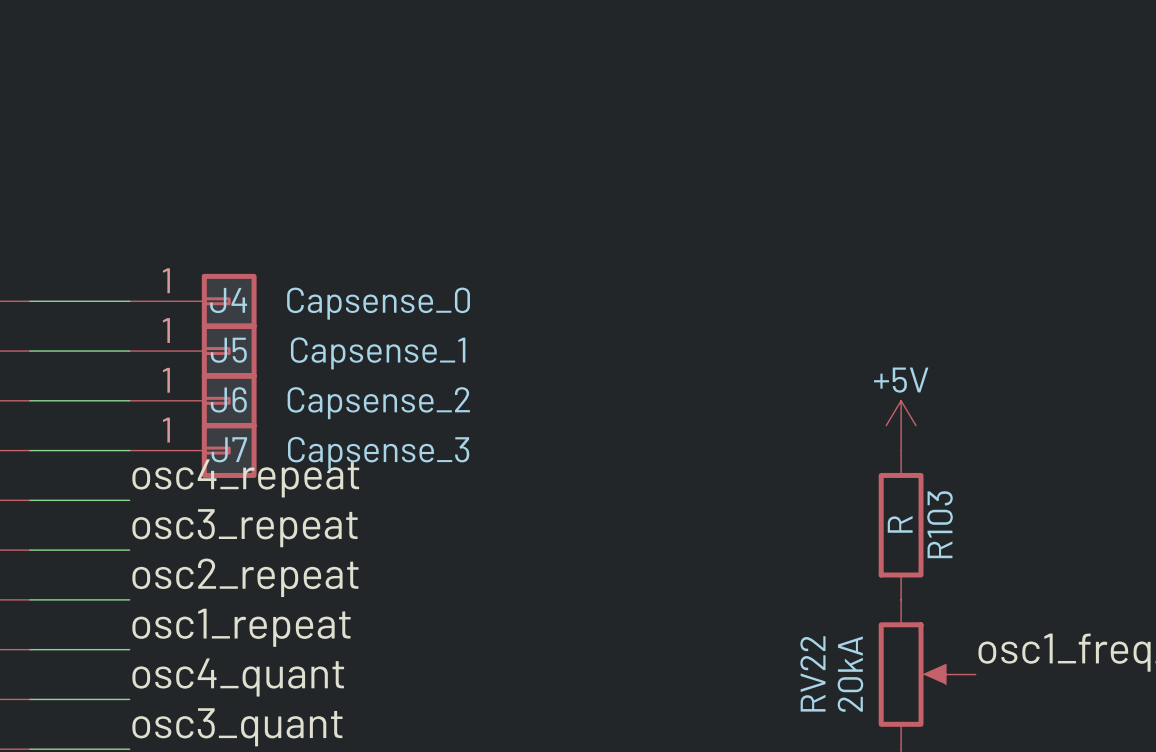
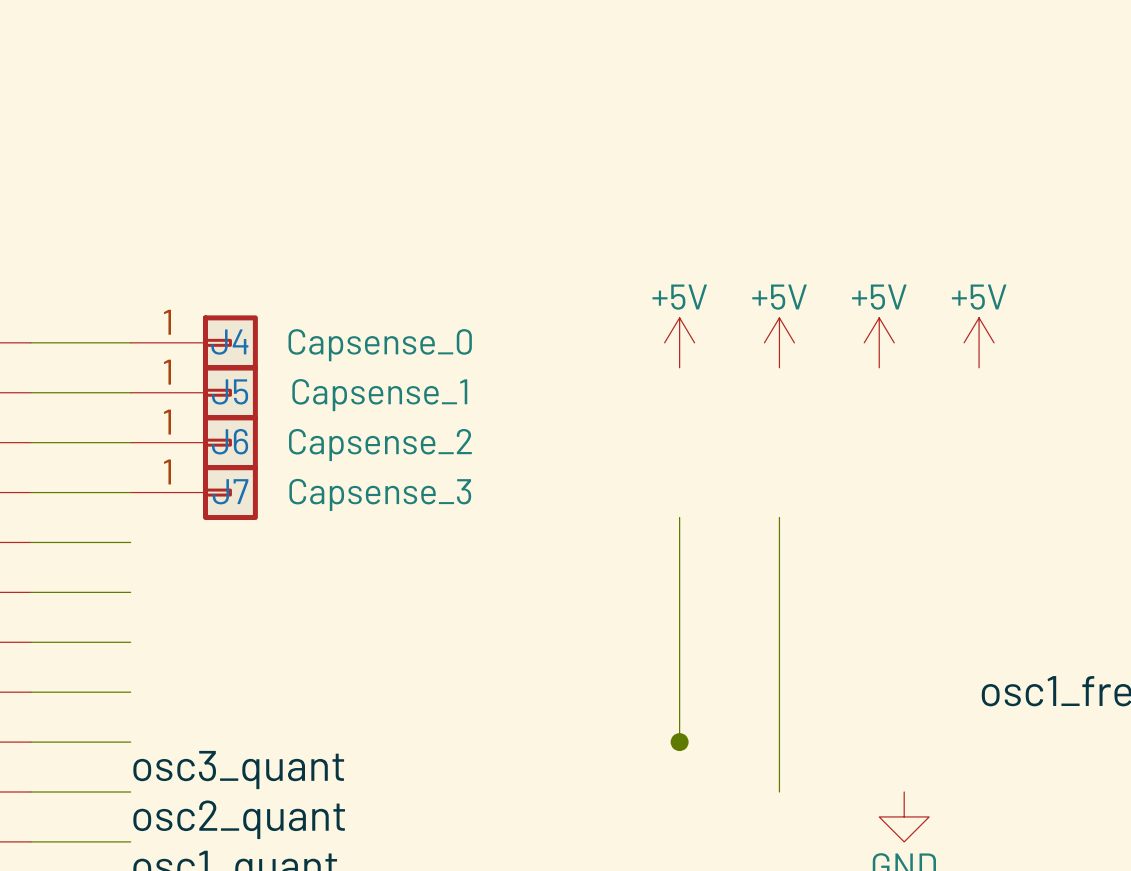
power symbol: none -> +5V (679, 342)
power symbol: none -> +5V (779, 342)
power symbol: none -> +5V (879, 342)
power symbol: none -> +5V (979, 342)
power symbol: +5V (901, 425) -> none
wire: none -> (679, 517) (679, 742)
wire: none -> (779, 517) (779, 792)
label: osc4_repeat (245, 478) -> none
R103: R (901, 525) -> none
label: osc3_repeat (245, 528) -> none
label: osc2_repeat (245, 577) -> none
label: osc1_repeat (241, 627) -> none
RV22: 20kA (927, 674) -> none
label: osc4_quant (238, 677) -> none
junction: none -> (679, 742)

